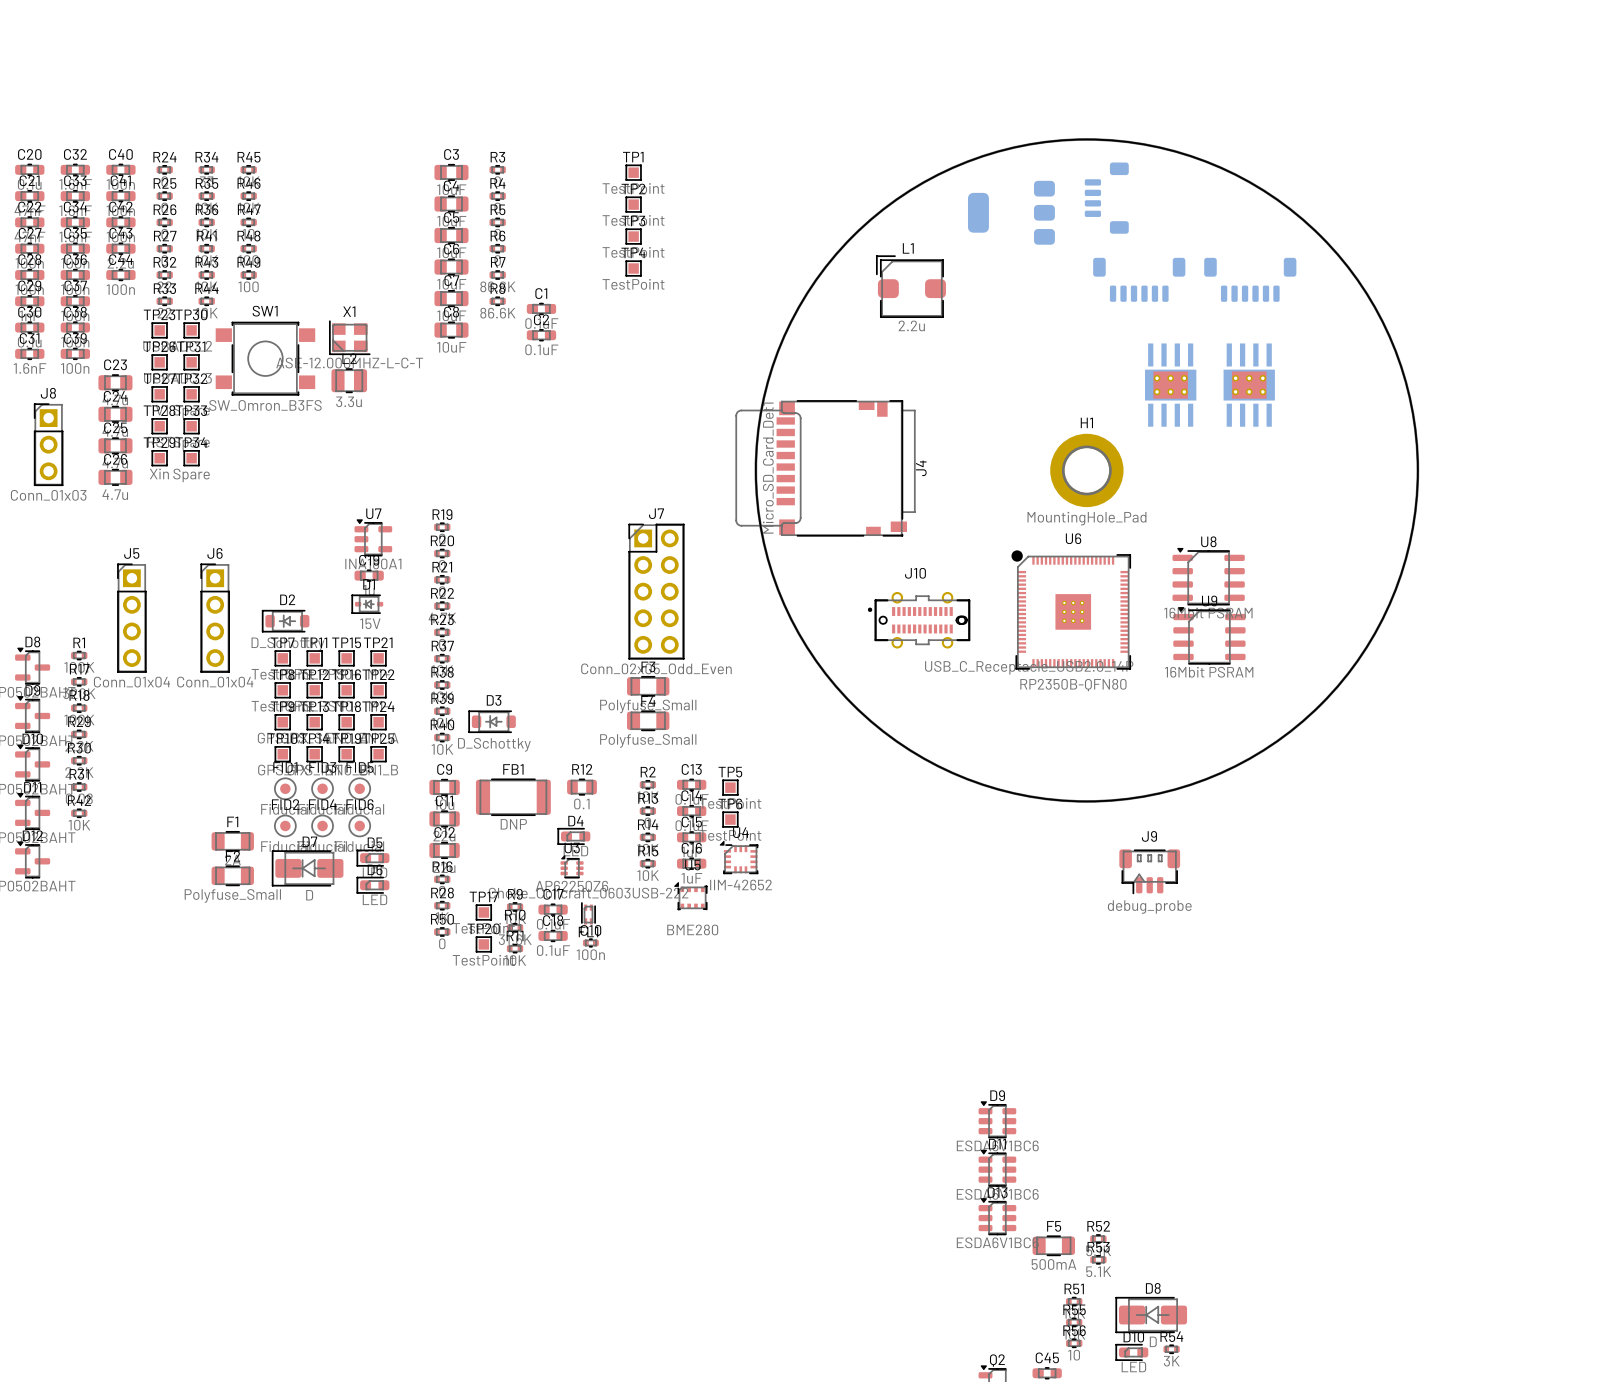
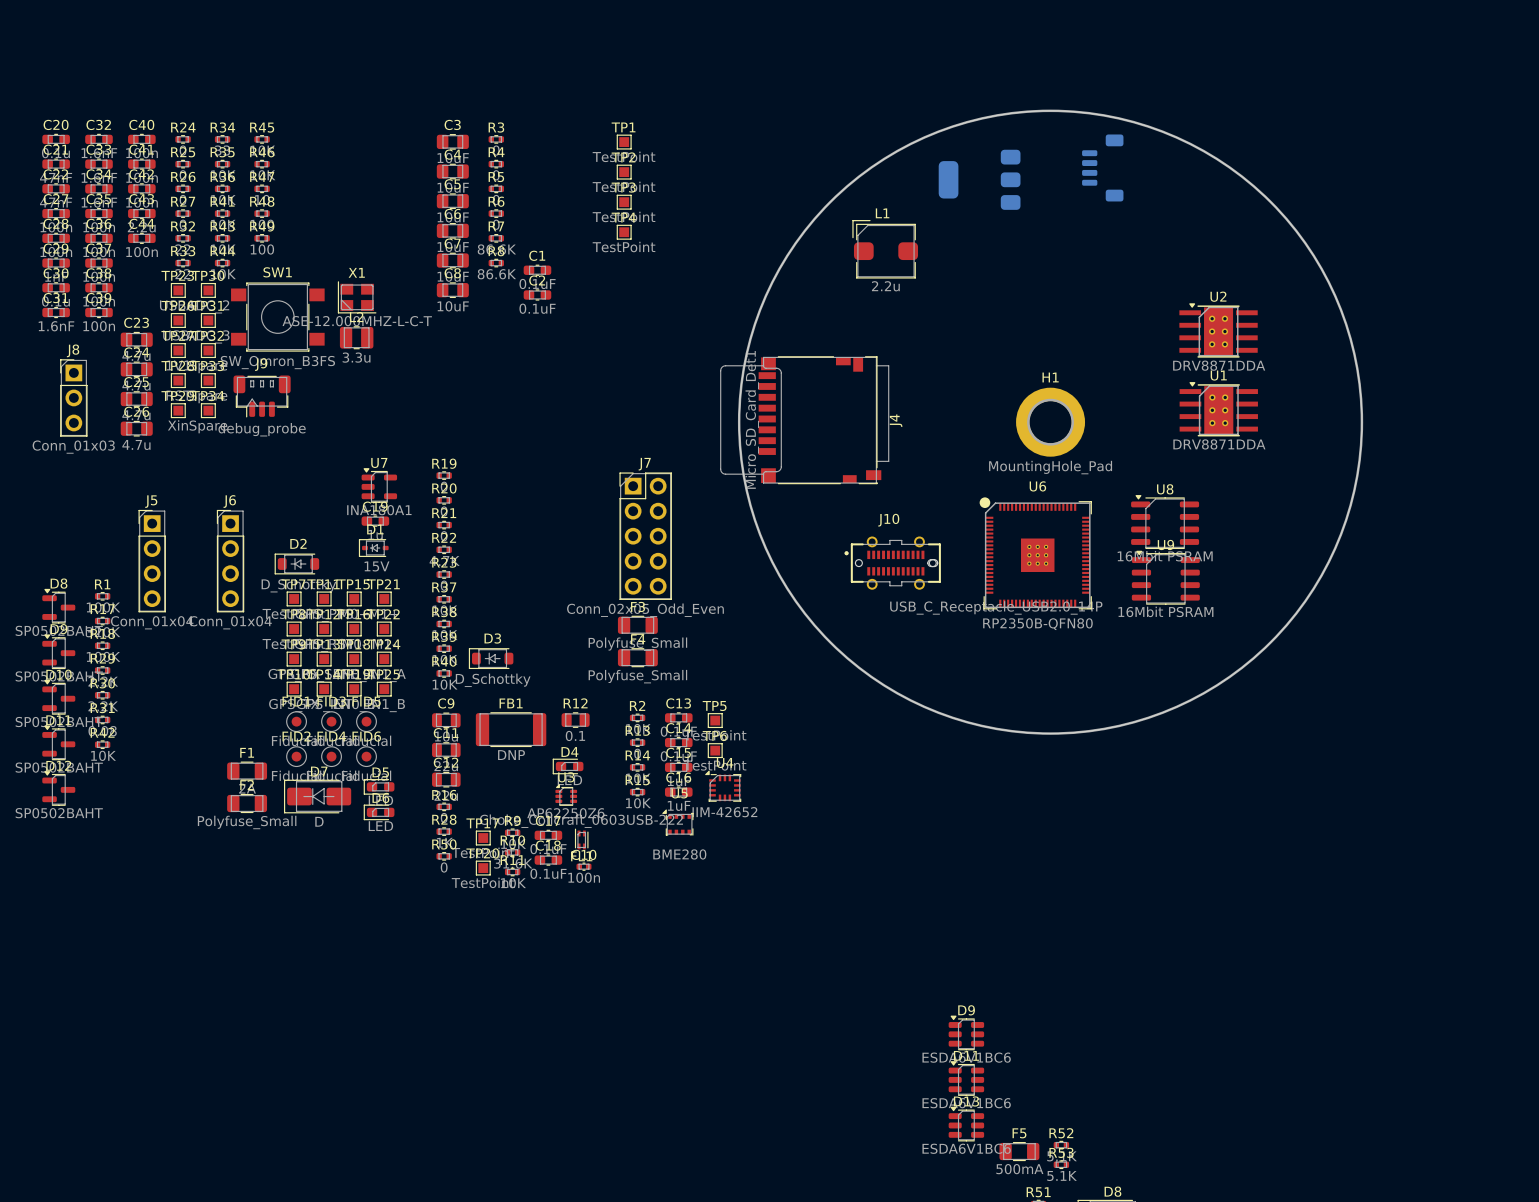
part position: (1106, 198) -> (1102, 167)
part: (1139, 279) -> none
part: (1250, 279) -> none
U2 side: bottom (1170, 385) -> top (1218, 330)
U1 side: bottom (1249, 385) -> top (1218, 409)
J9 position: (1149, 871) -> (262, 396)

